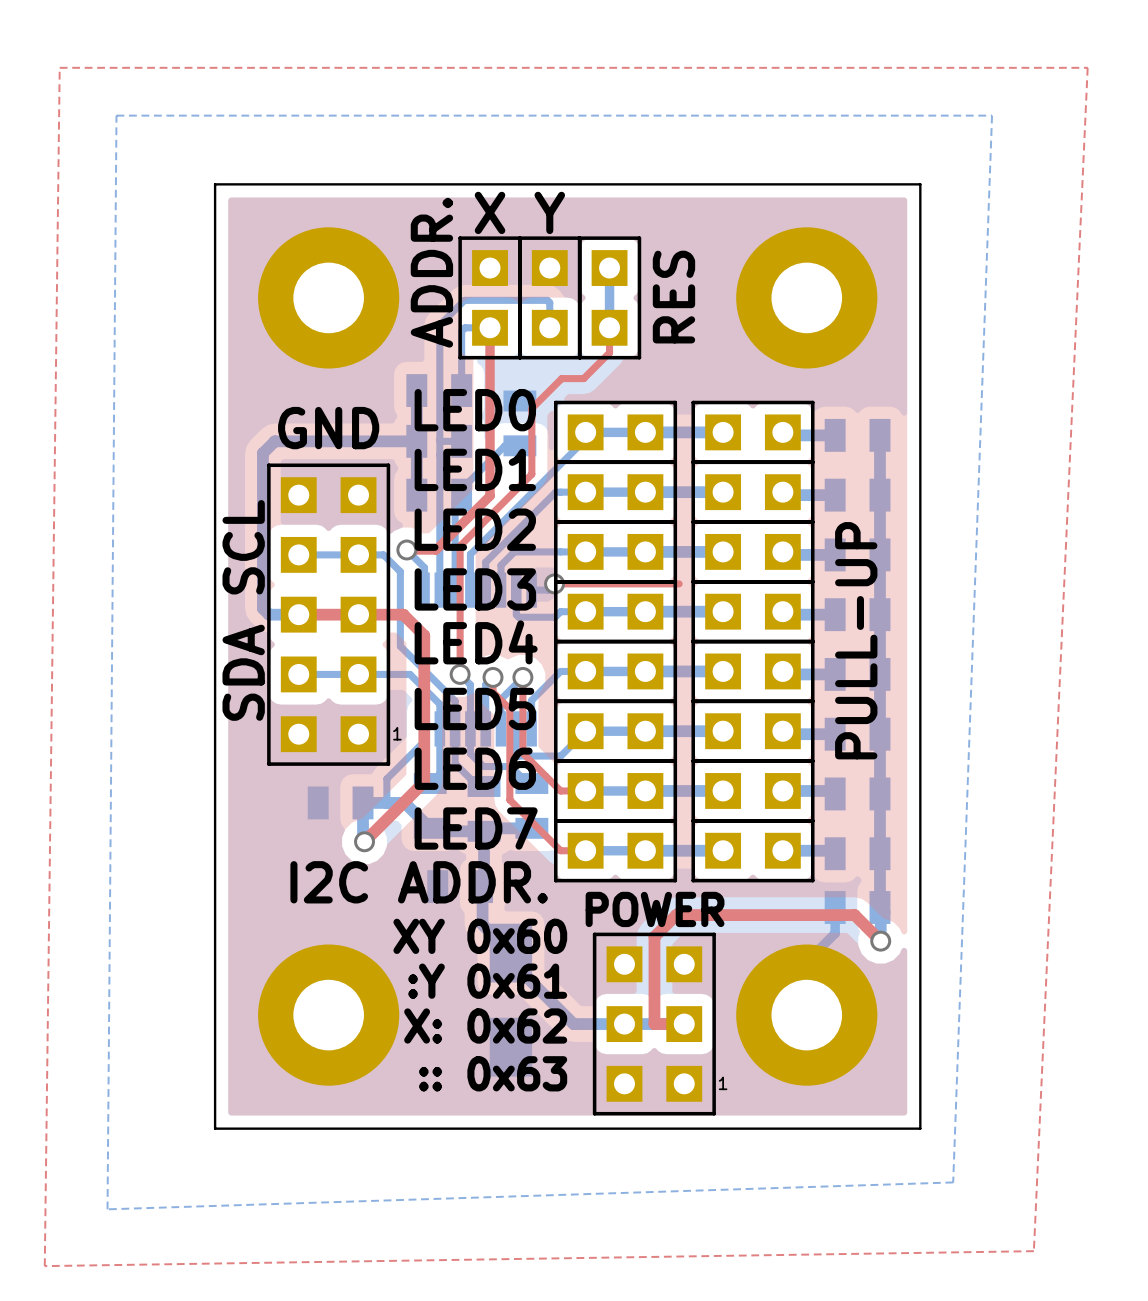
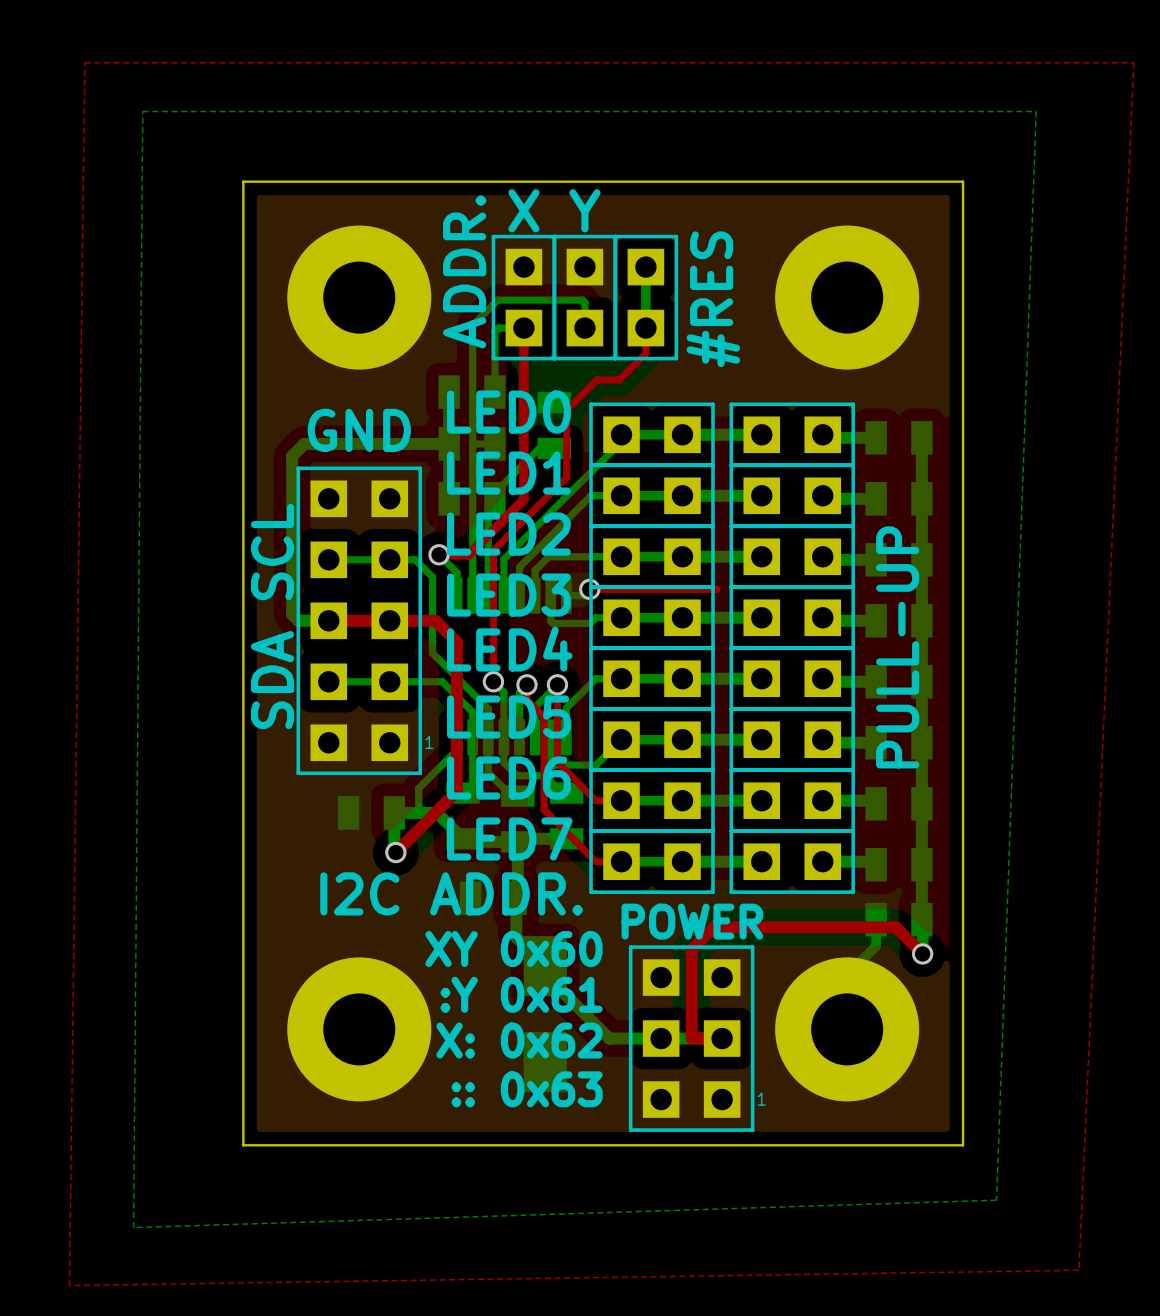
text: RES (673, 297) -> #RES (713, 299)

